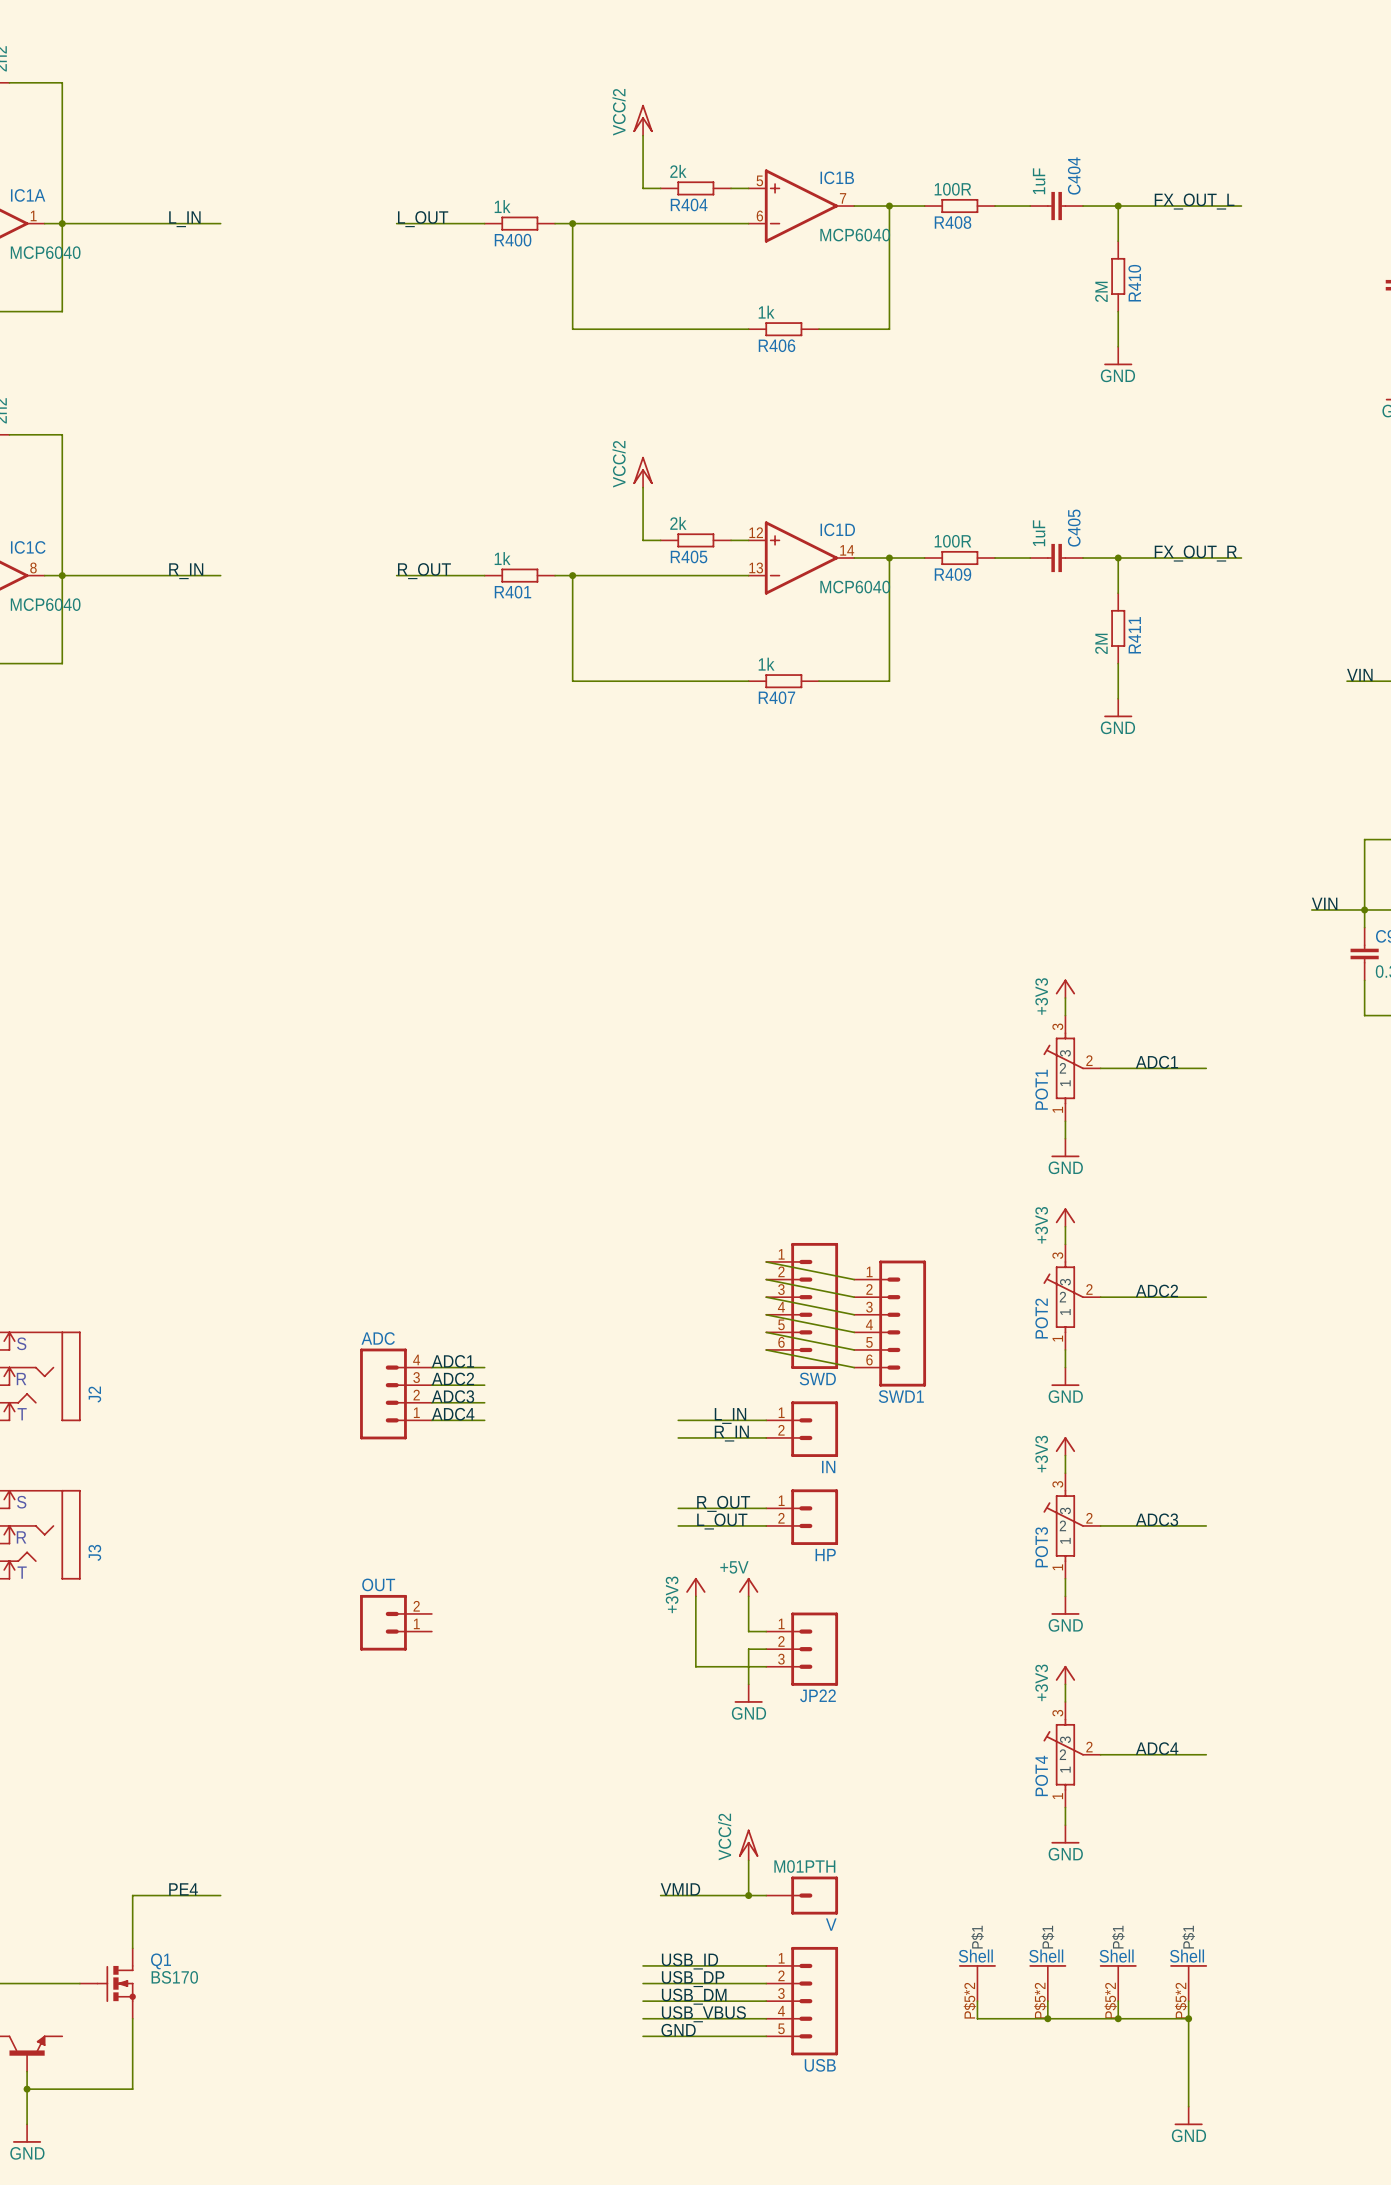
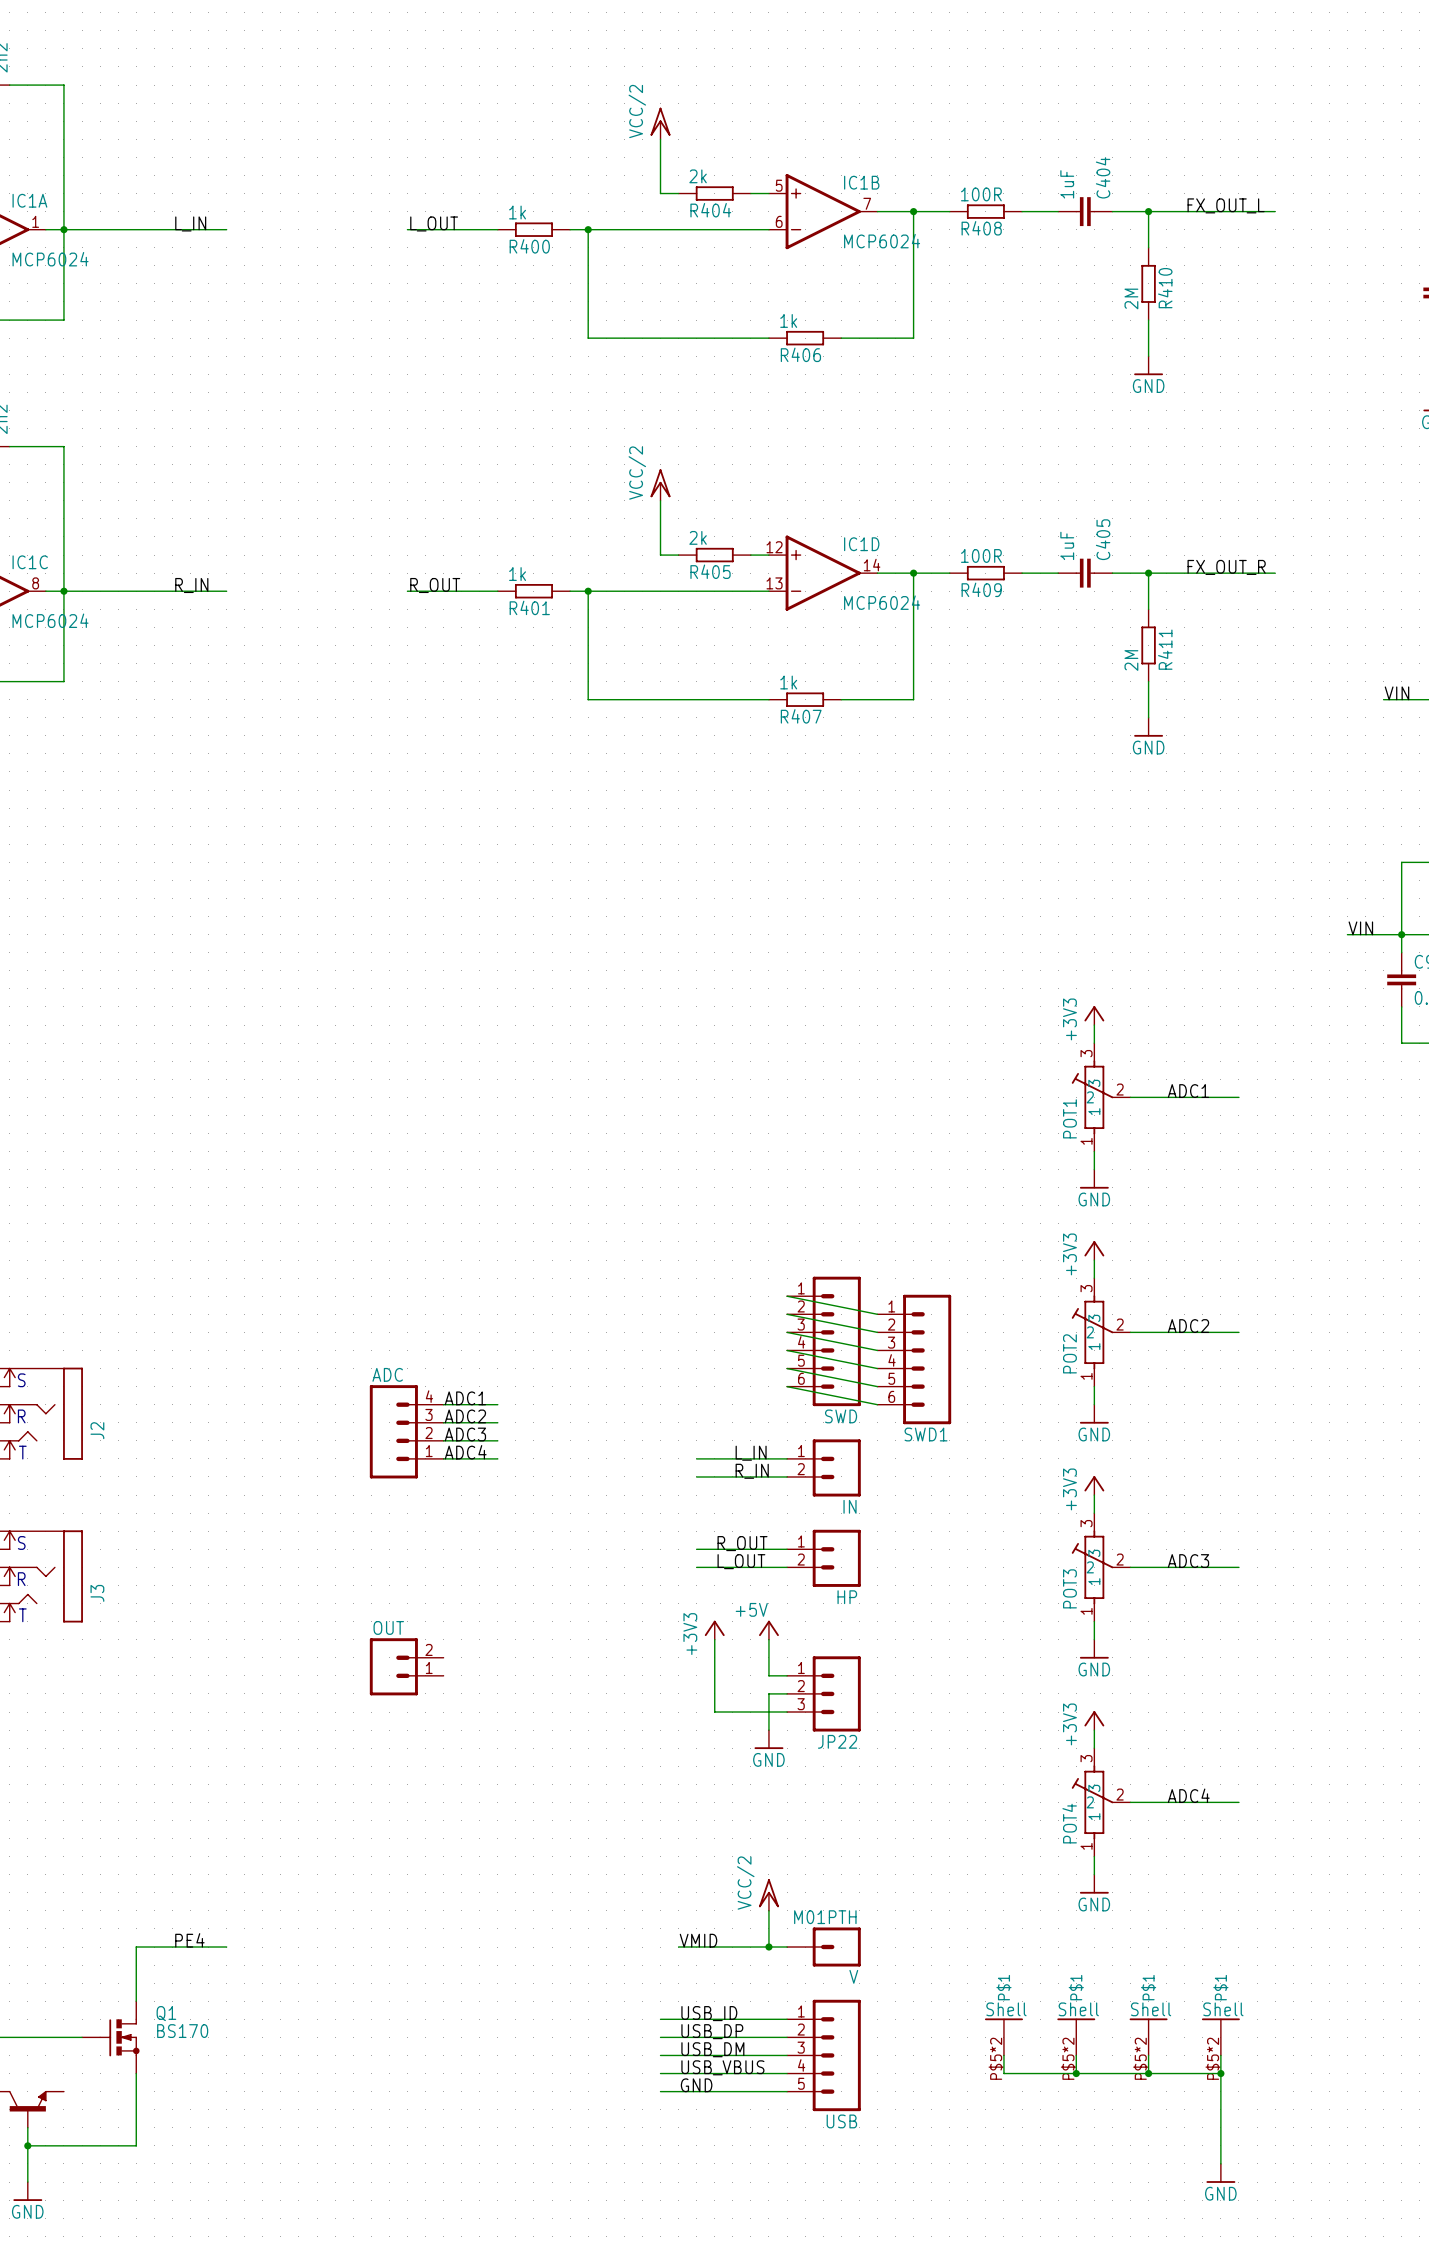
IC1B value: MCP6040 (855, 235) -> MCP6024 (882, 241)
IC1A value: MCP6040 (45, 252) -> MCP6024 (50, 259)
IC1D value: MCP6040 (855, 587) -> MCP6024 (882, 602)
IC1C value: MCP6040 (45, 604) -> MCP6024 (50, 620)

